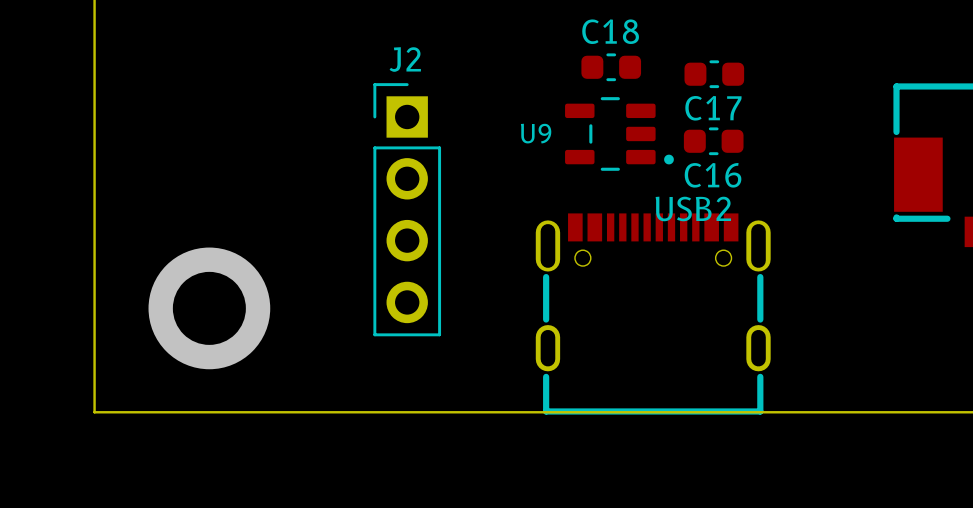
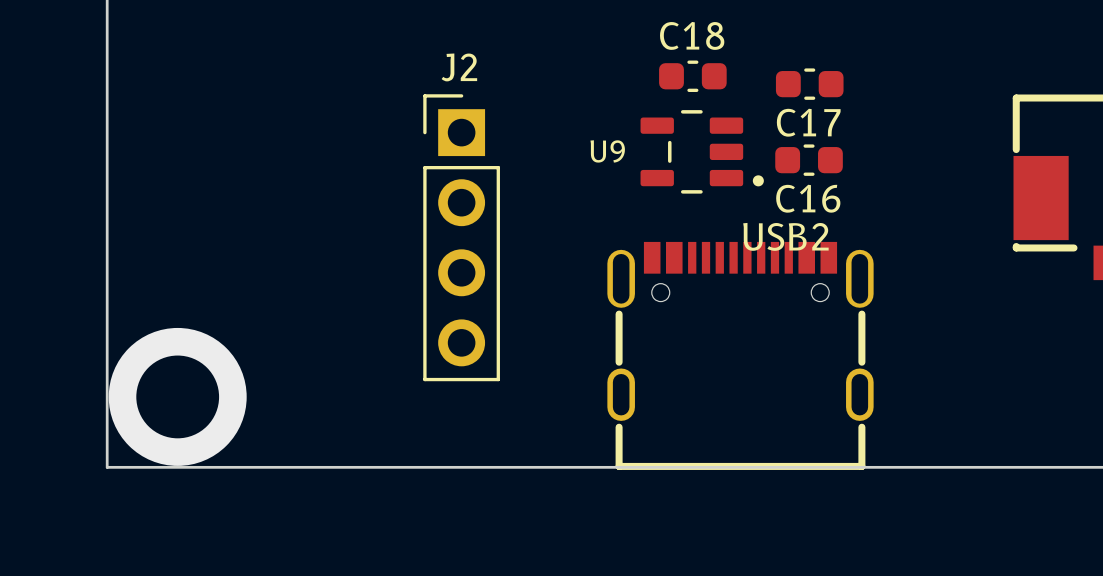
via position: (209, 308) -> (177, 396)

